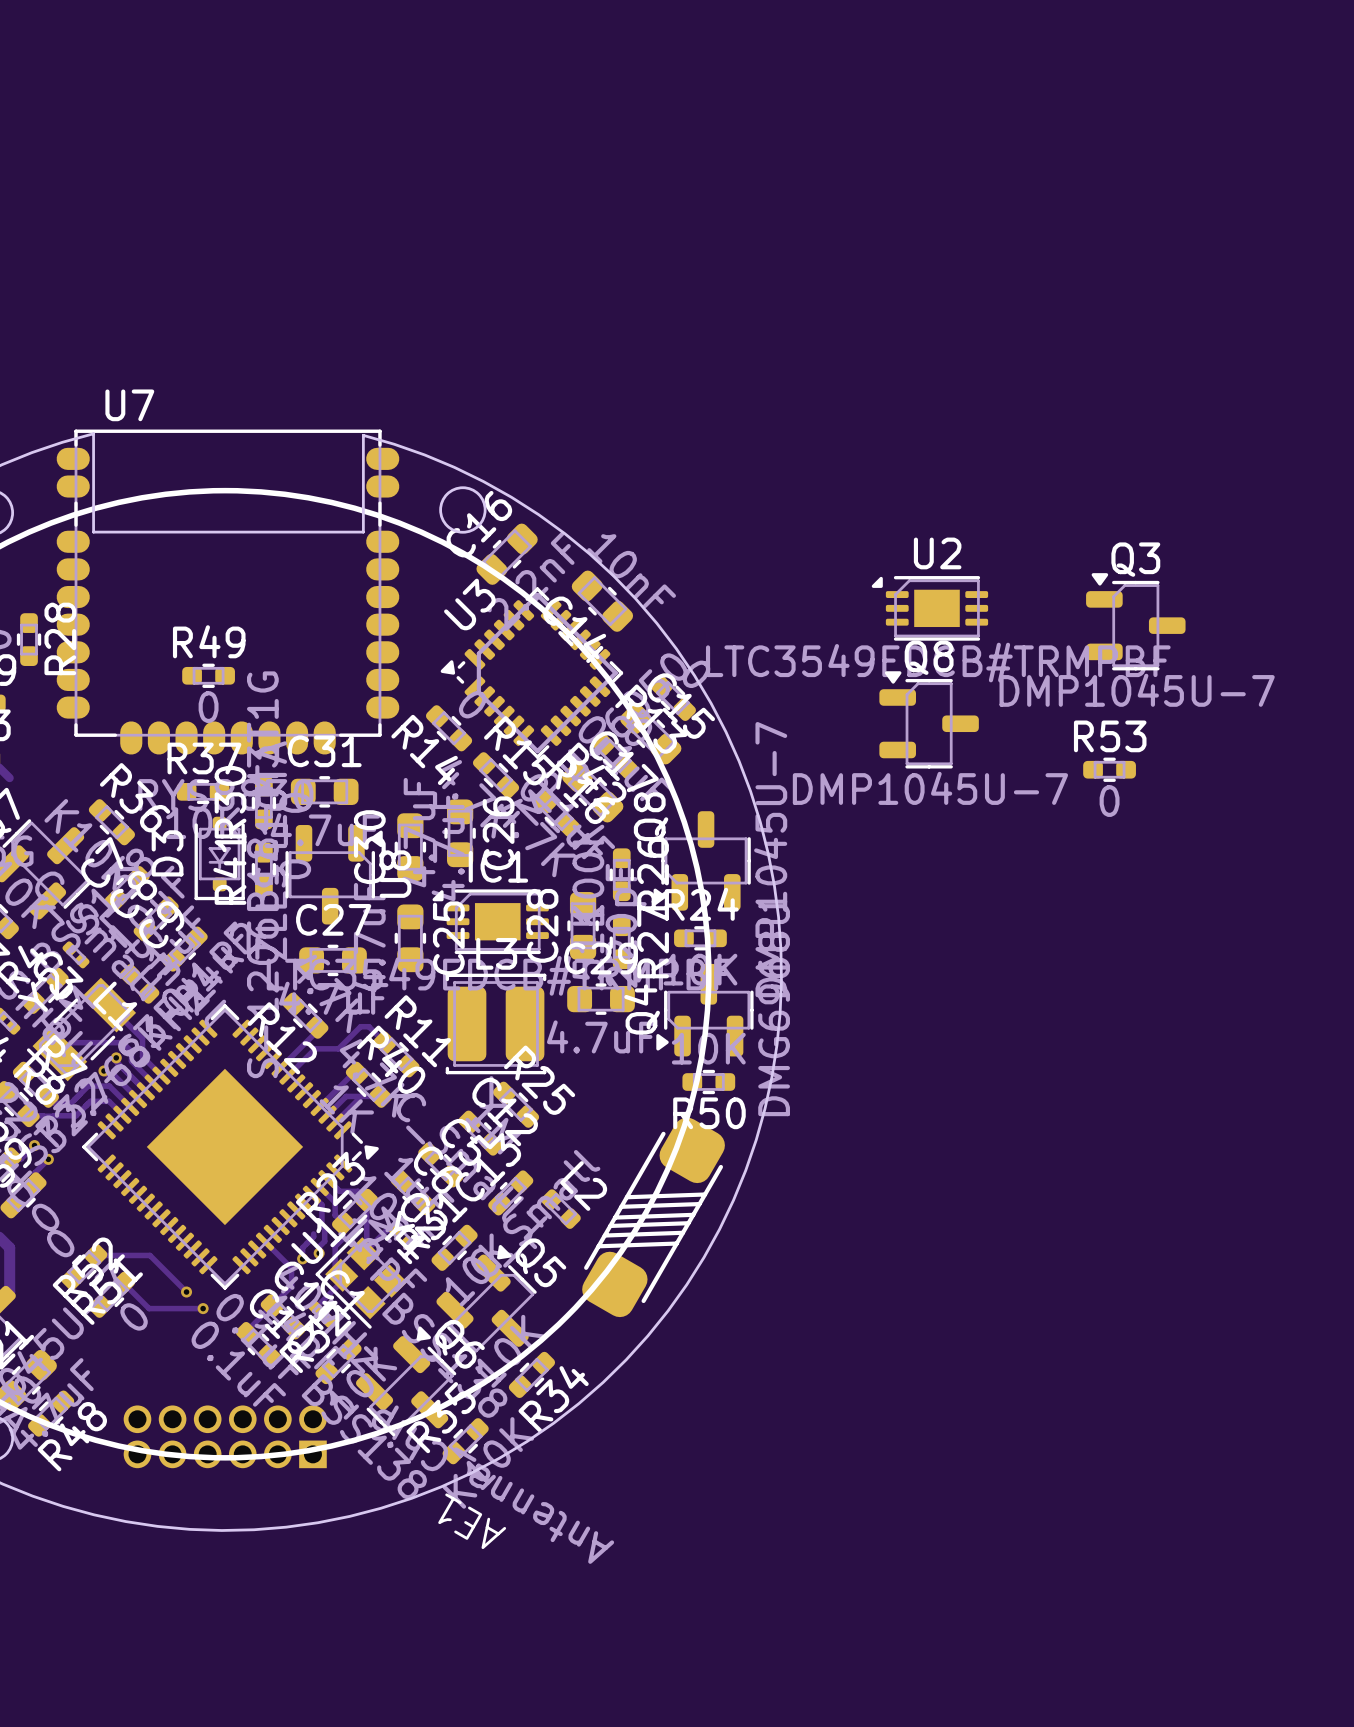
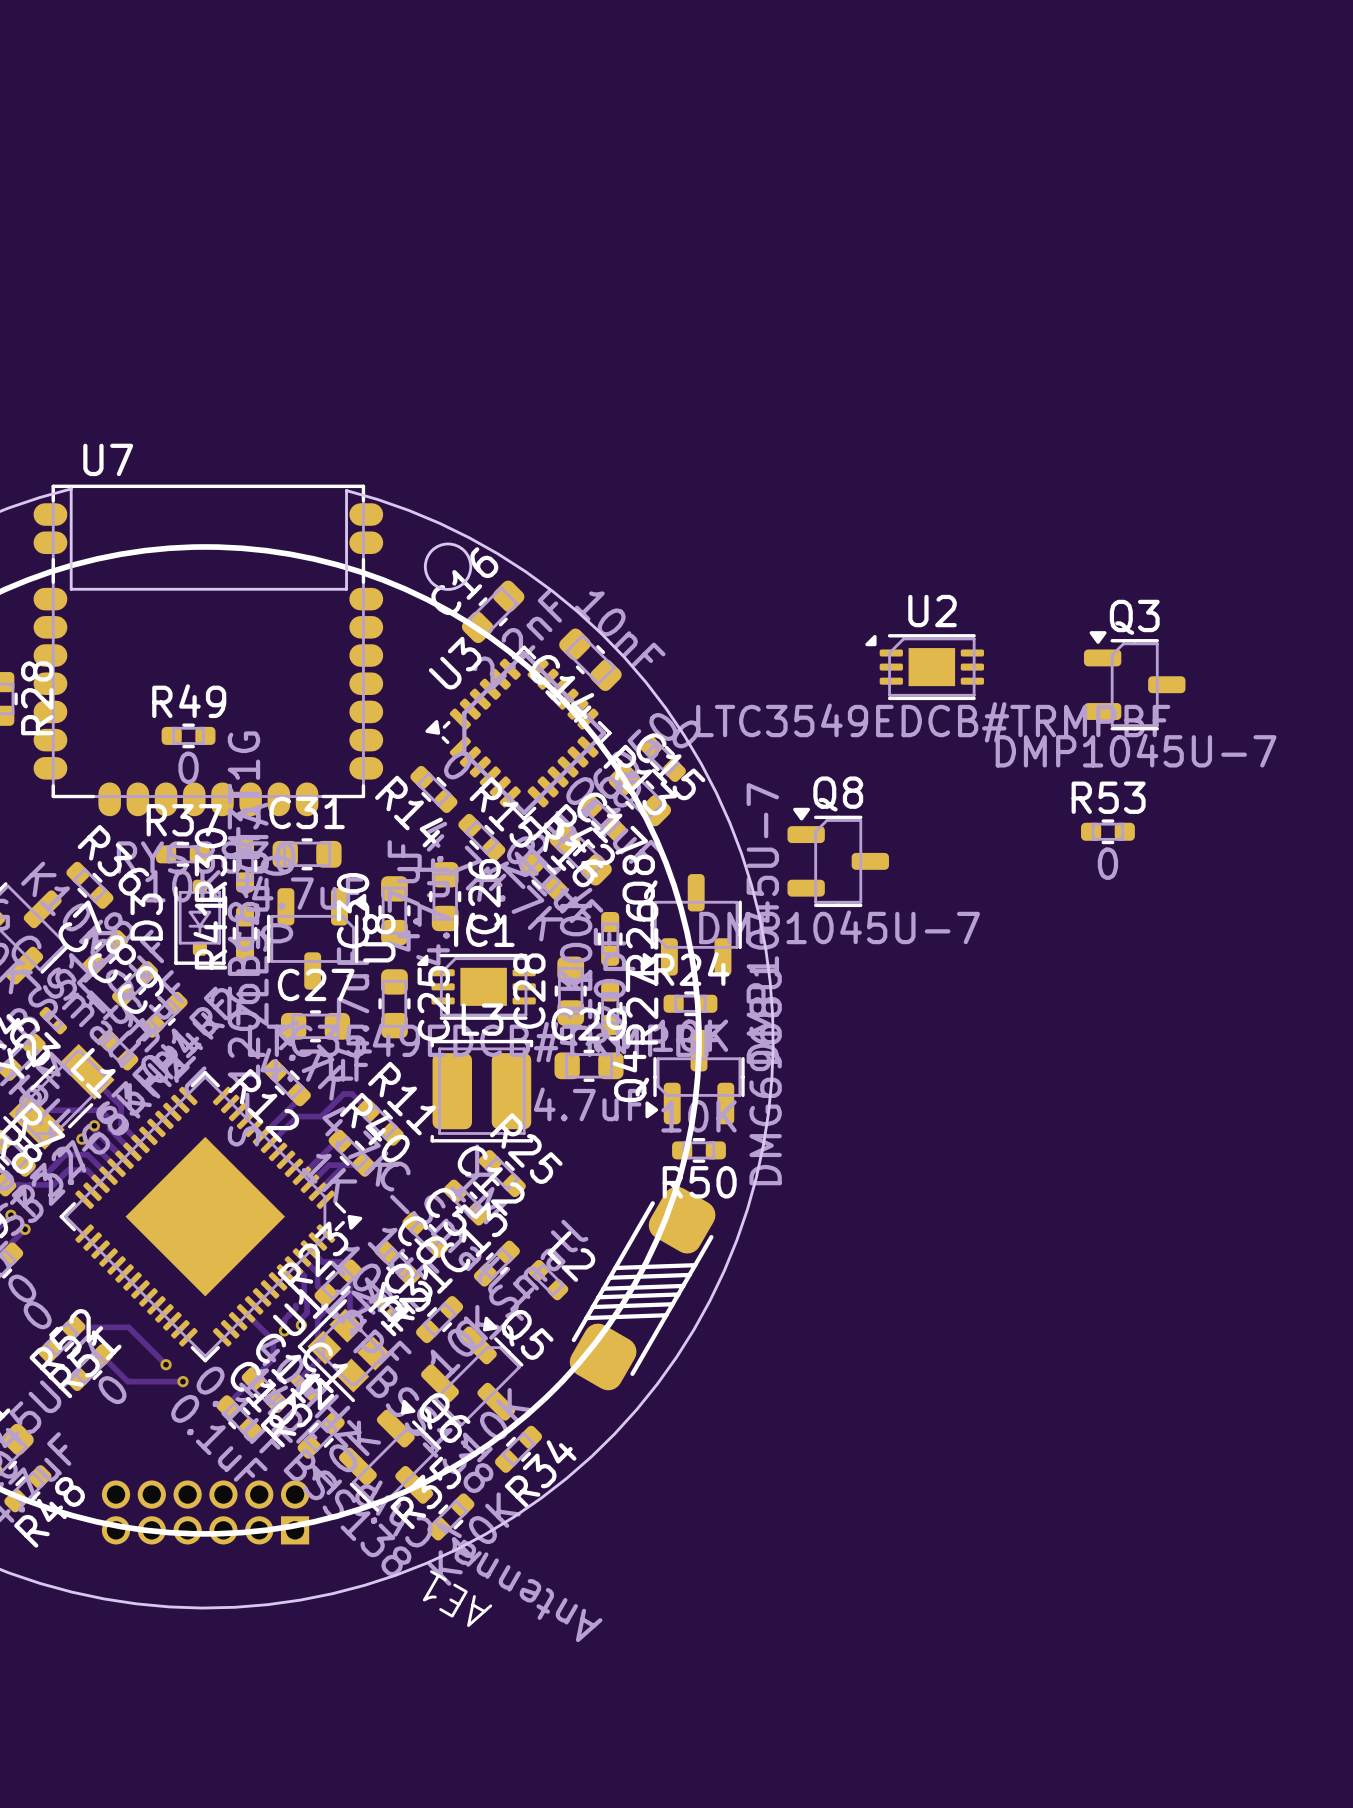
Q8 position: (929, 719) -> (838, 857)

